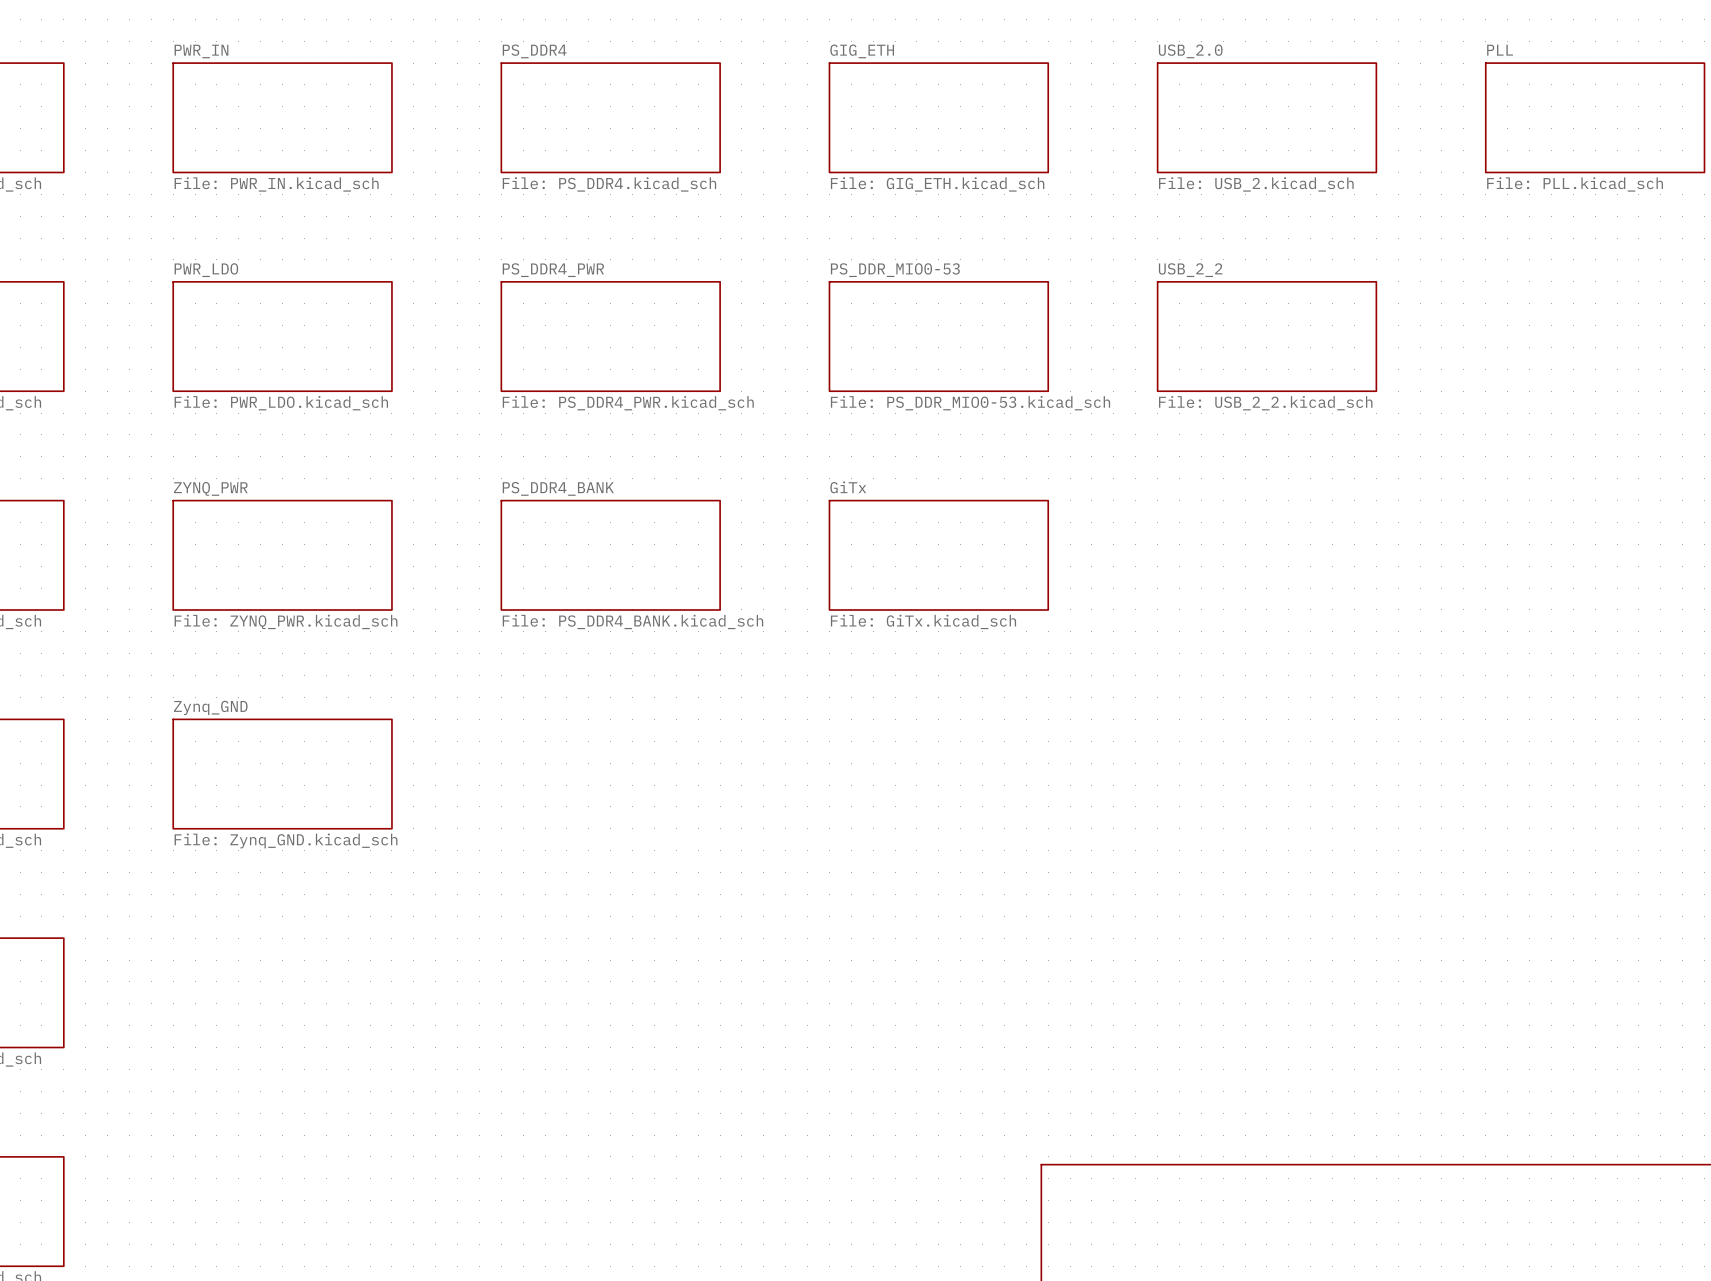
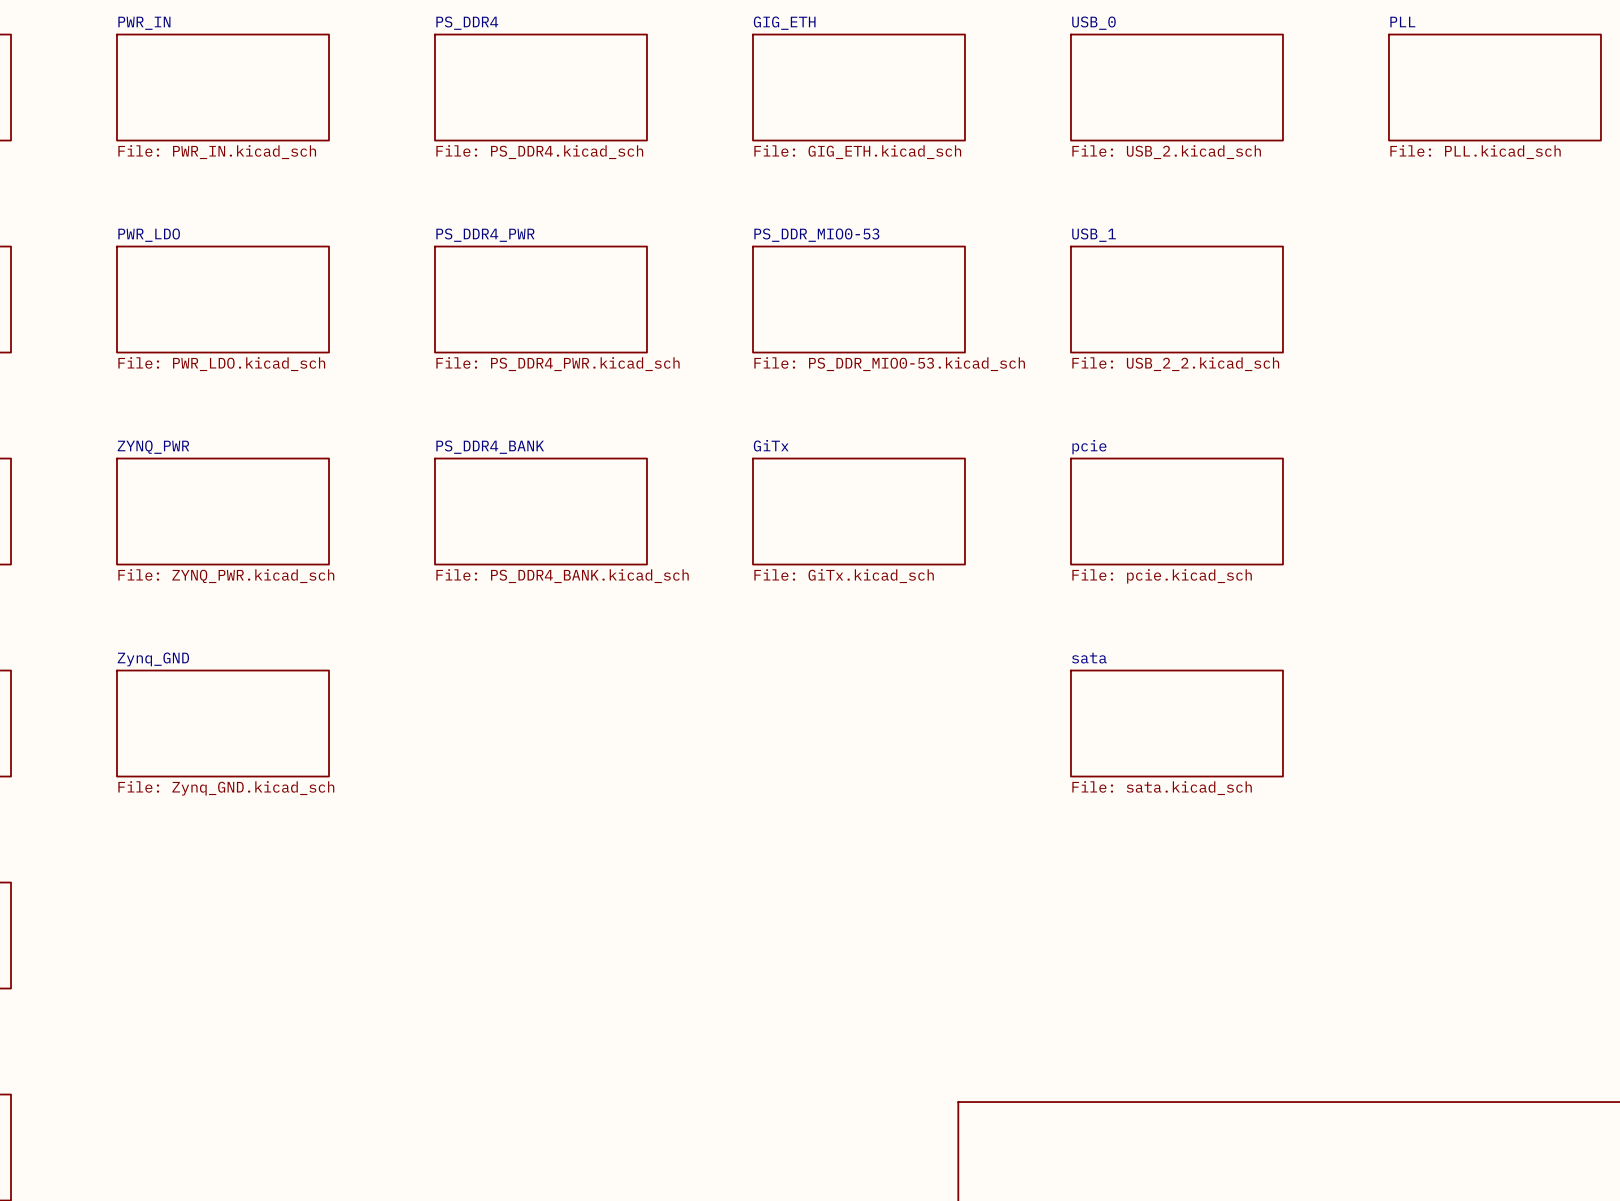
sheet USB_2.0 name: USB_2.0 (1190, 51) -> USB_0 (1093, 23)
sheet USB_2_2 name: USB_2_2 (1190, 270) -> USB_1 (1094, 235)
sheet pcie: none -> File: pcie.kicad_sch (1176, 511)
sheet sata: none -> File: sata.kicad_sch (1176, 723)

